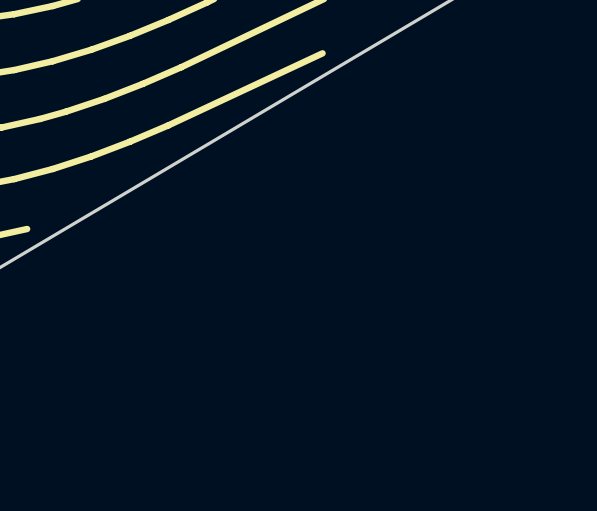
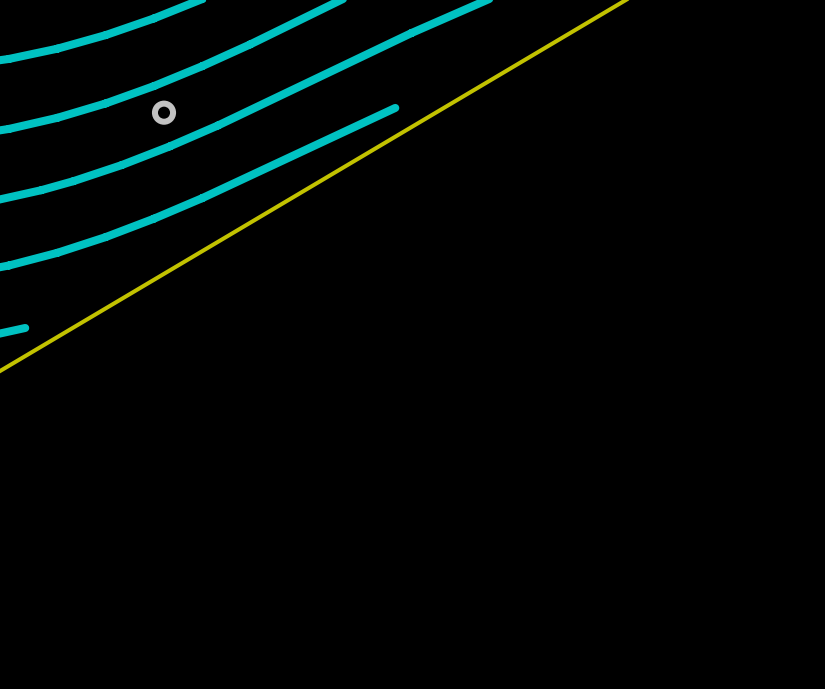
via: none -> (164, 112)

